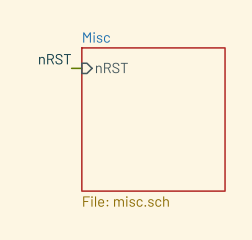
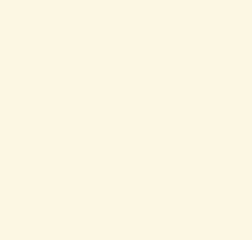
label: nRST (55, 59) -> none
sheet pin: nRST (111, 67) -> none
wire: (71, 68) (81, 68) -> none
sheet Misc: File: misc.sch (153, 119) -> none

